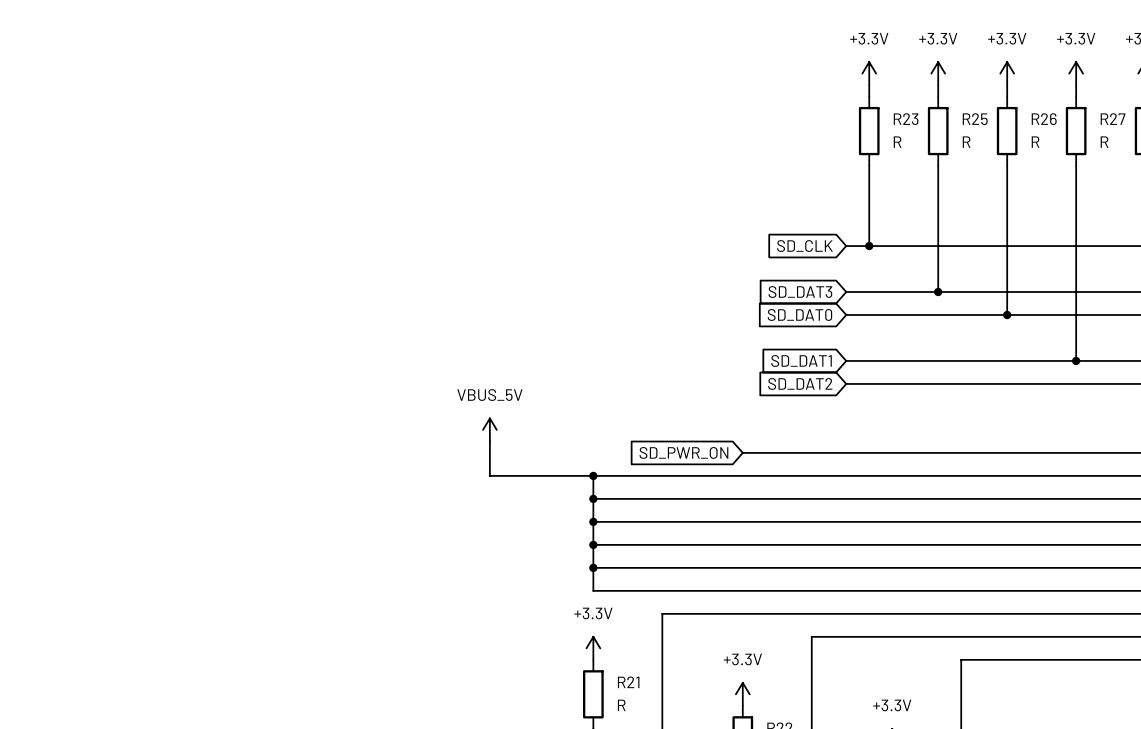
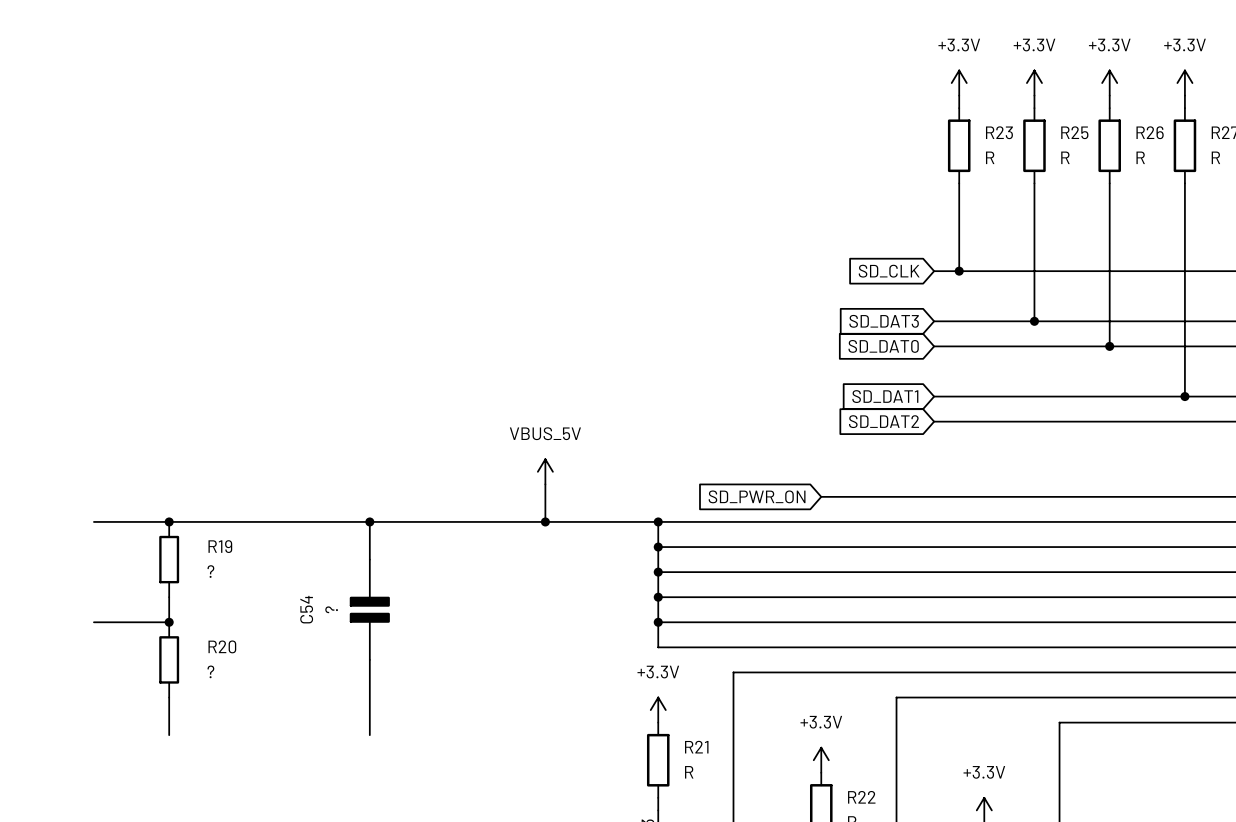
wire: none -> (93, 521) (545, 521)
junction: none -> (169, 521)
wire: none -> (369, 521) (369, 559)
junction: none -> (369, 521)
junction: none -> (545, 521)
R19: none -> ? (169, 559)
wire: none -> (169, 597) (169, 622) (93, 622)
C54: none -> ? (369, 609)
junction: none -> (169, 622)
R20: none -> ? (169, 659)
wire: none -> (369, 659) (369, 735)
wire: none -> (169, 697) (169, 735)

